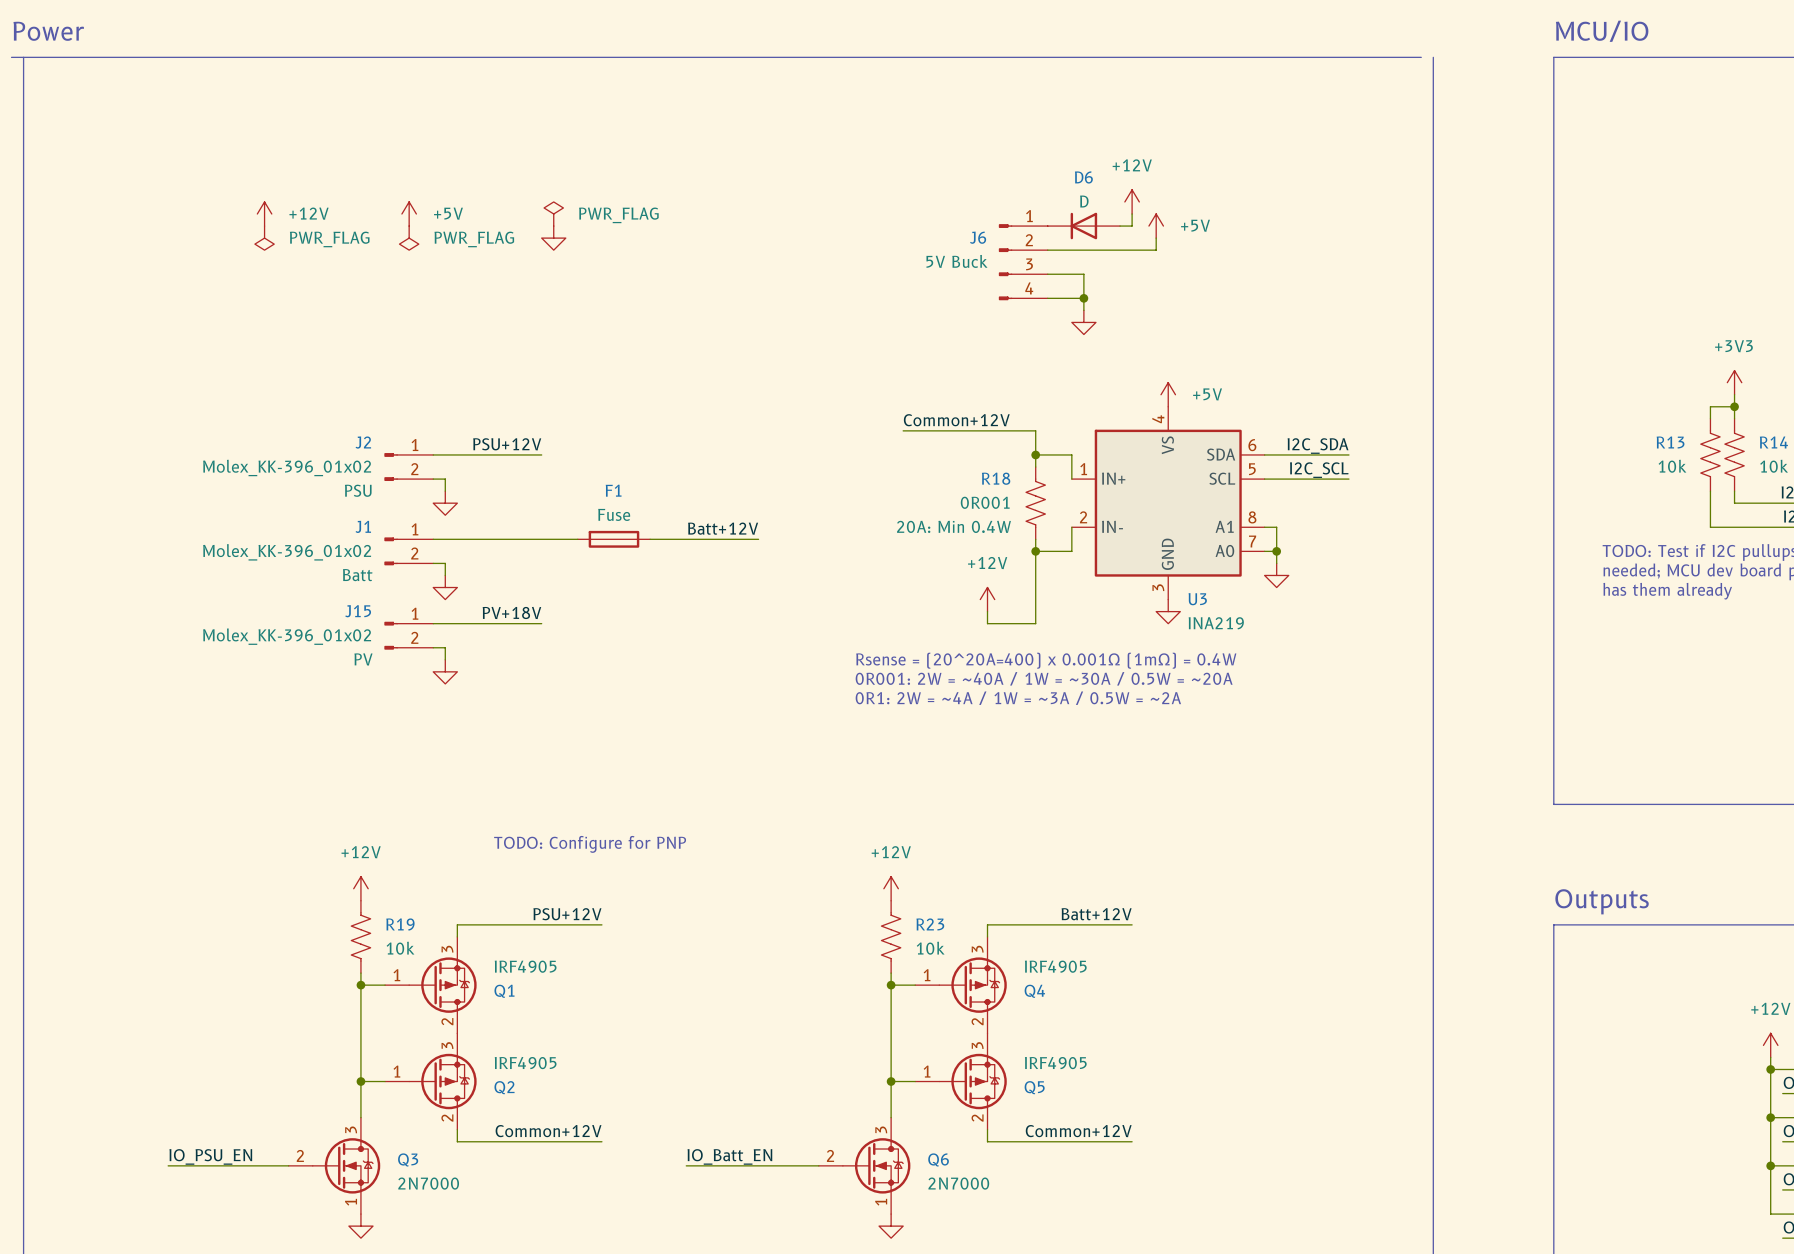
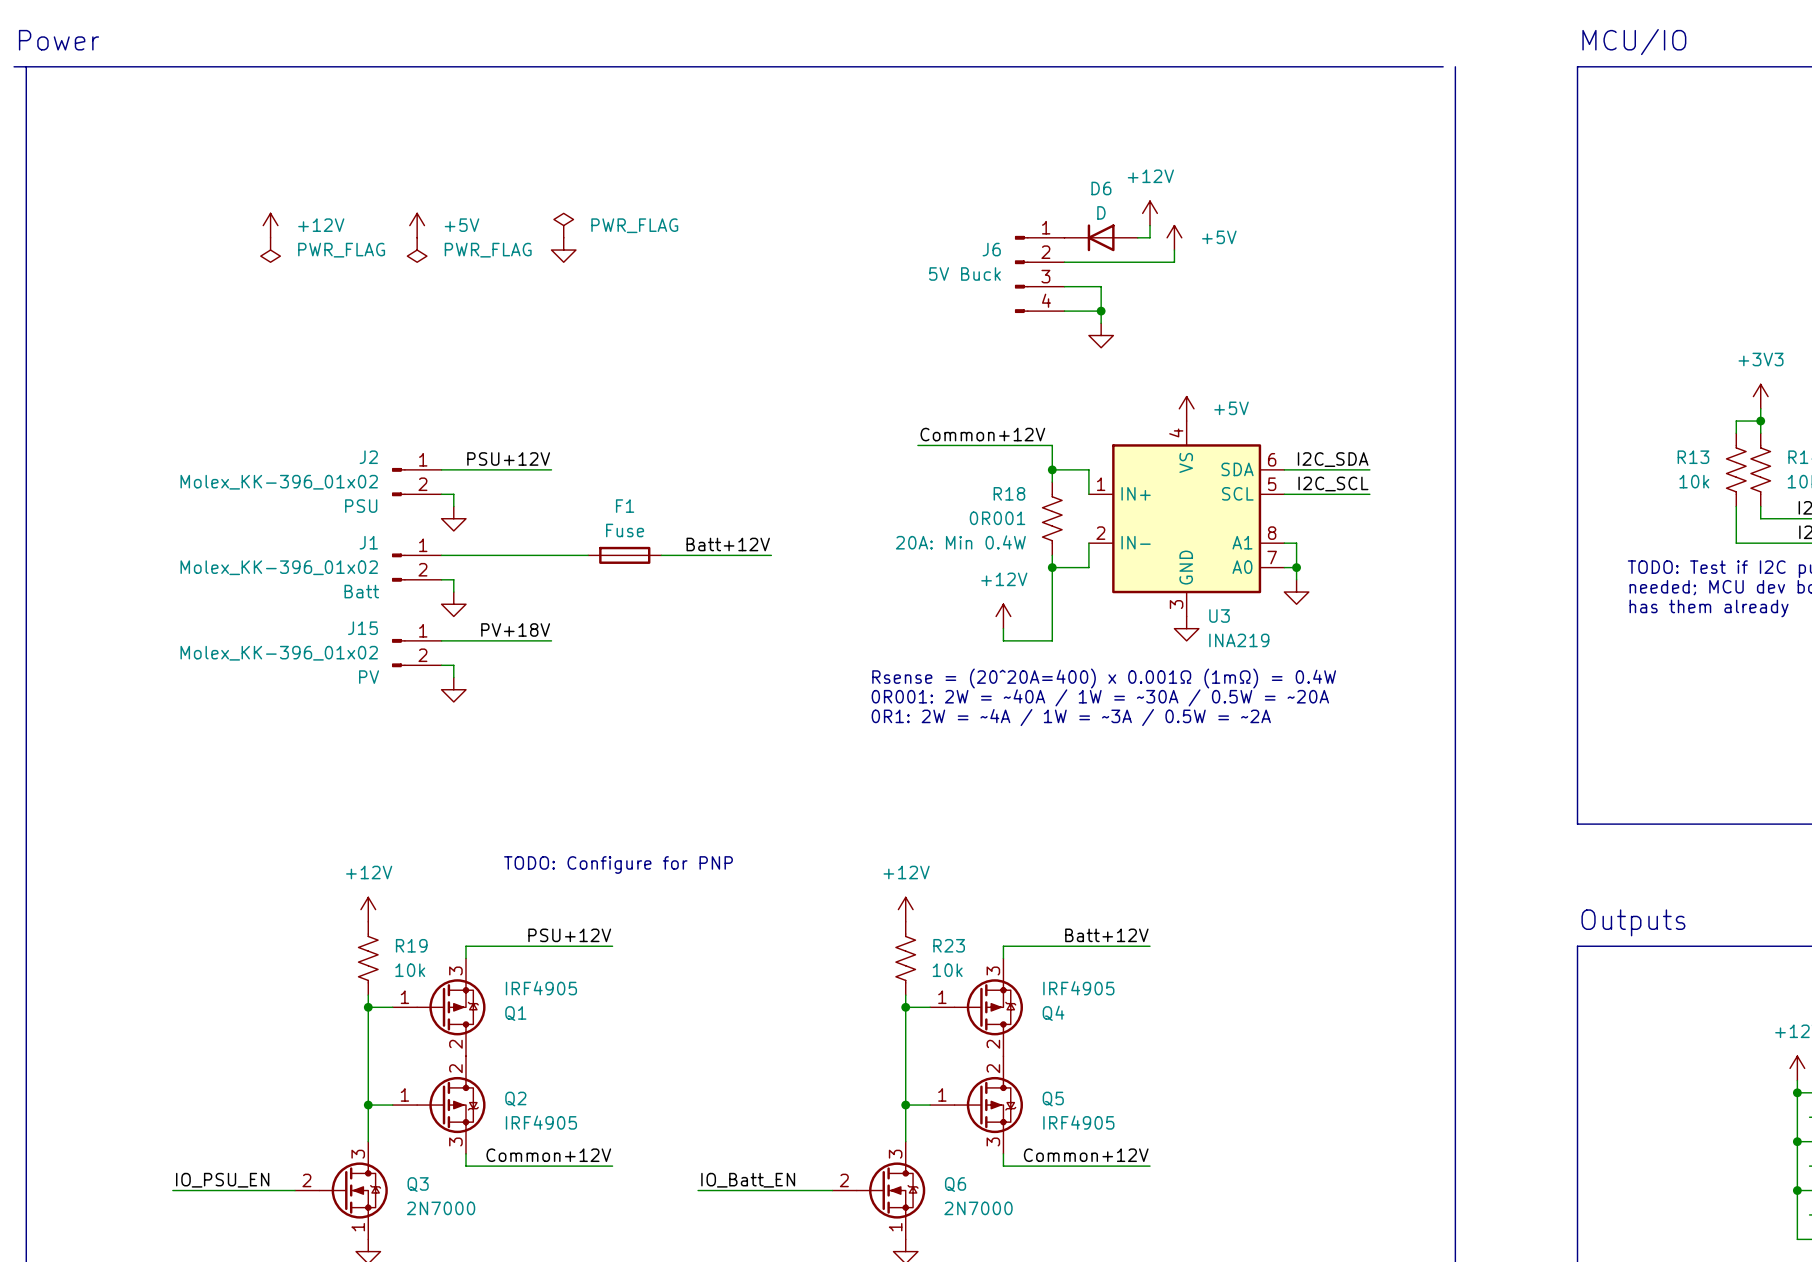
Q2 flip: as is (442, 1081) -> up-down (451, 1105)
Q5 flip: as is (973, 1081) -> up-down (988, 1105)

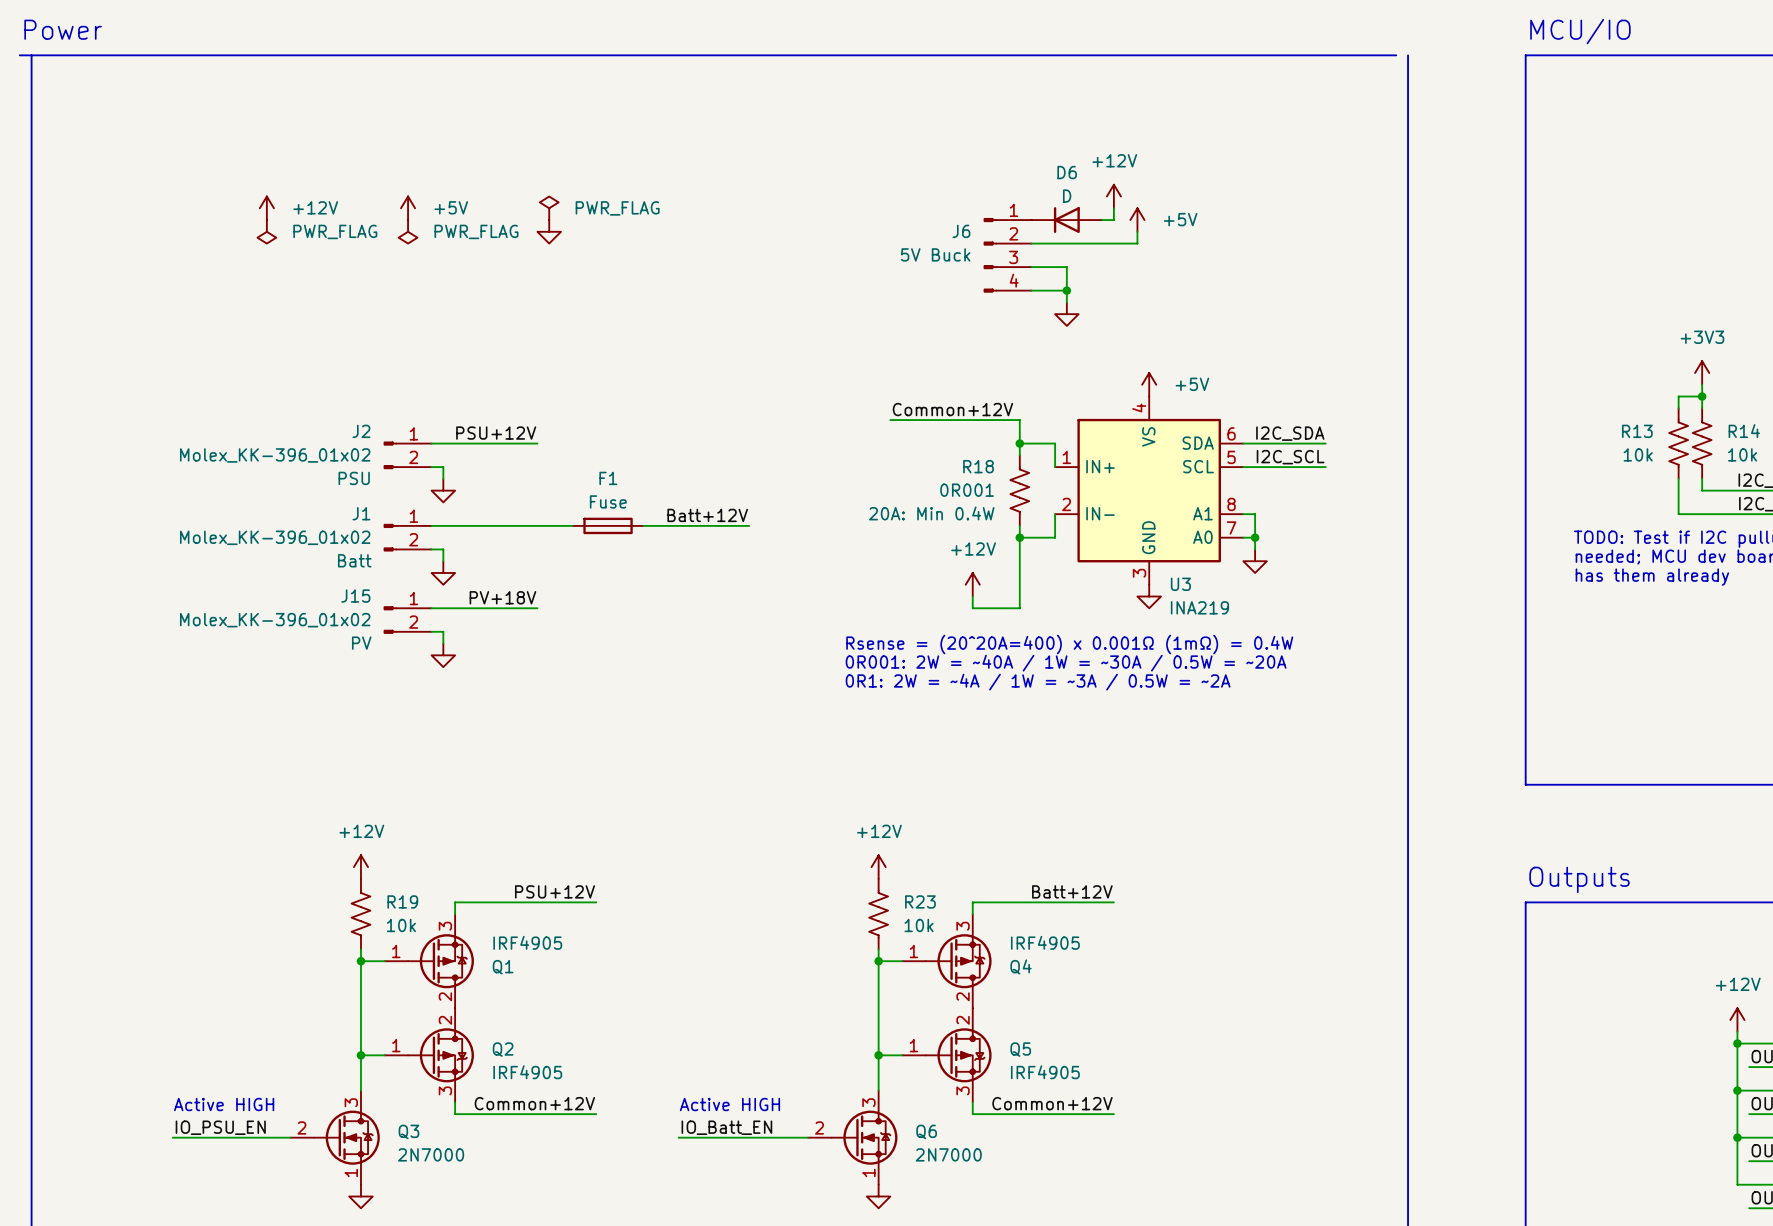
text: TODO: Configure for PNP (618, 864) -> none
text: none -> Active HIGH (224, 1104)
text: none -> Active HIGH (729, 1104)

